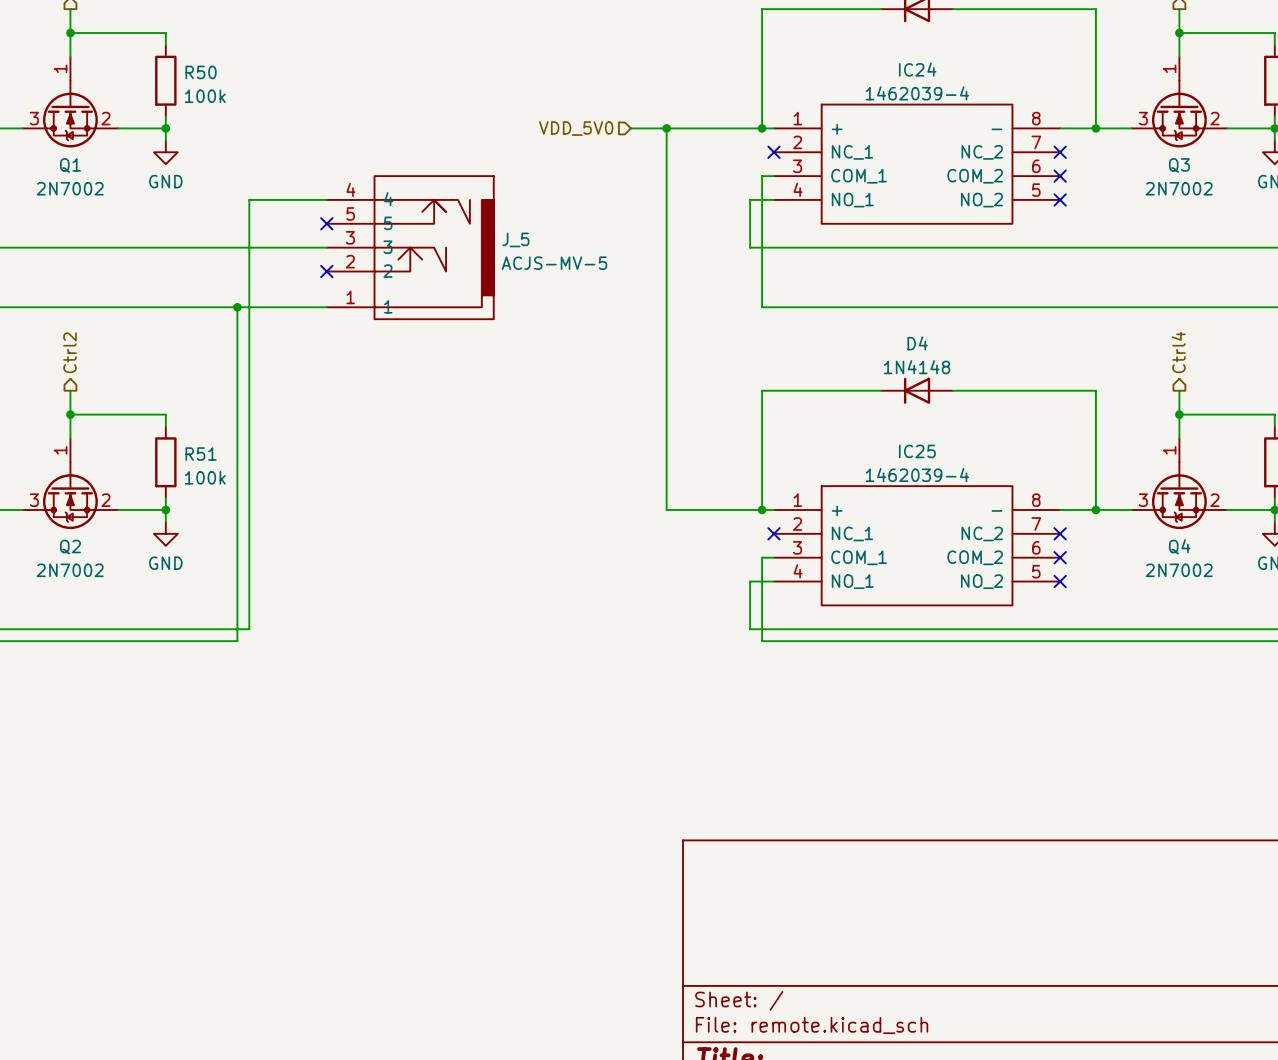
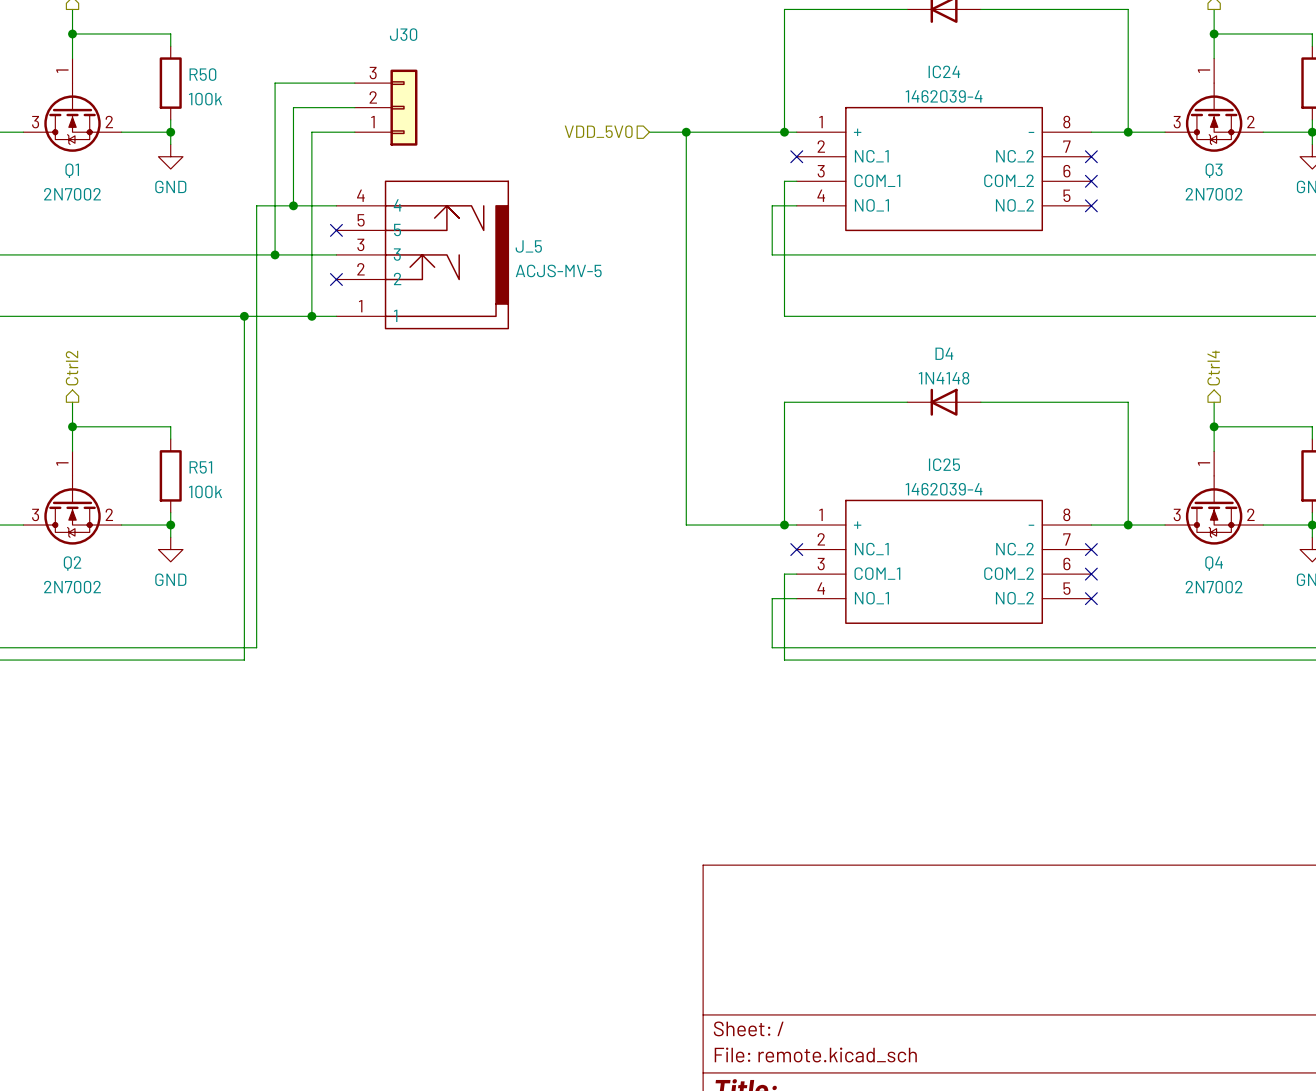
wire: none -> (354, 83) (275, 83) (275, 254)
wire: none -> (354, 107) (293, 107) (293, 205)
J30: none -> (386, 107)
wire: none -> (354, 132) (311, 132) (311, 316)
junction: none -> (293, 205)
junction: none -> (275, 254)
junction: none -> (311, 316)

